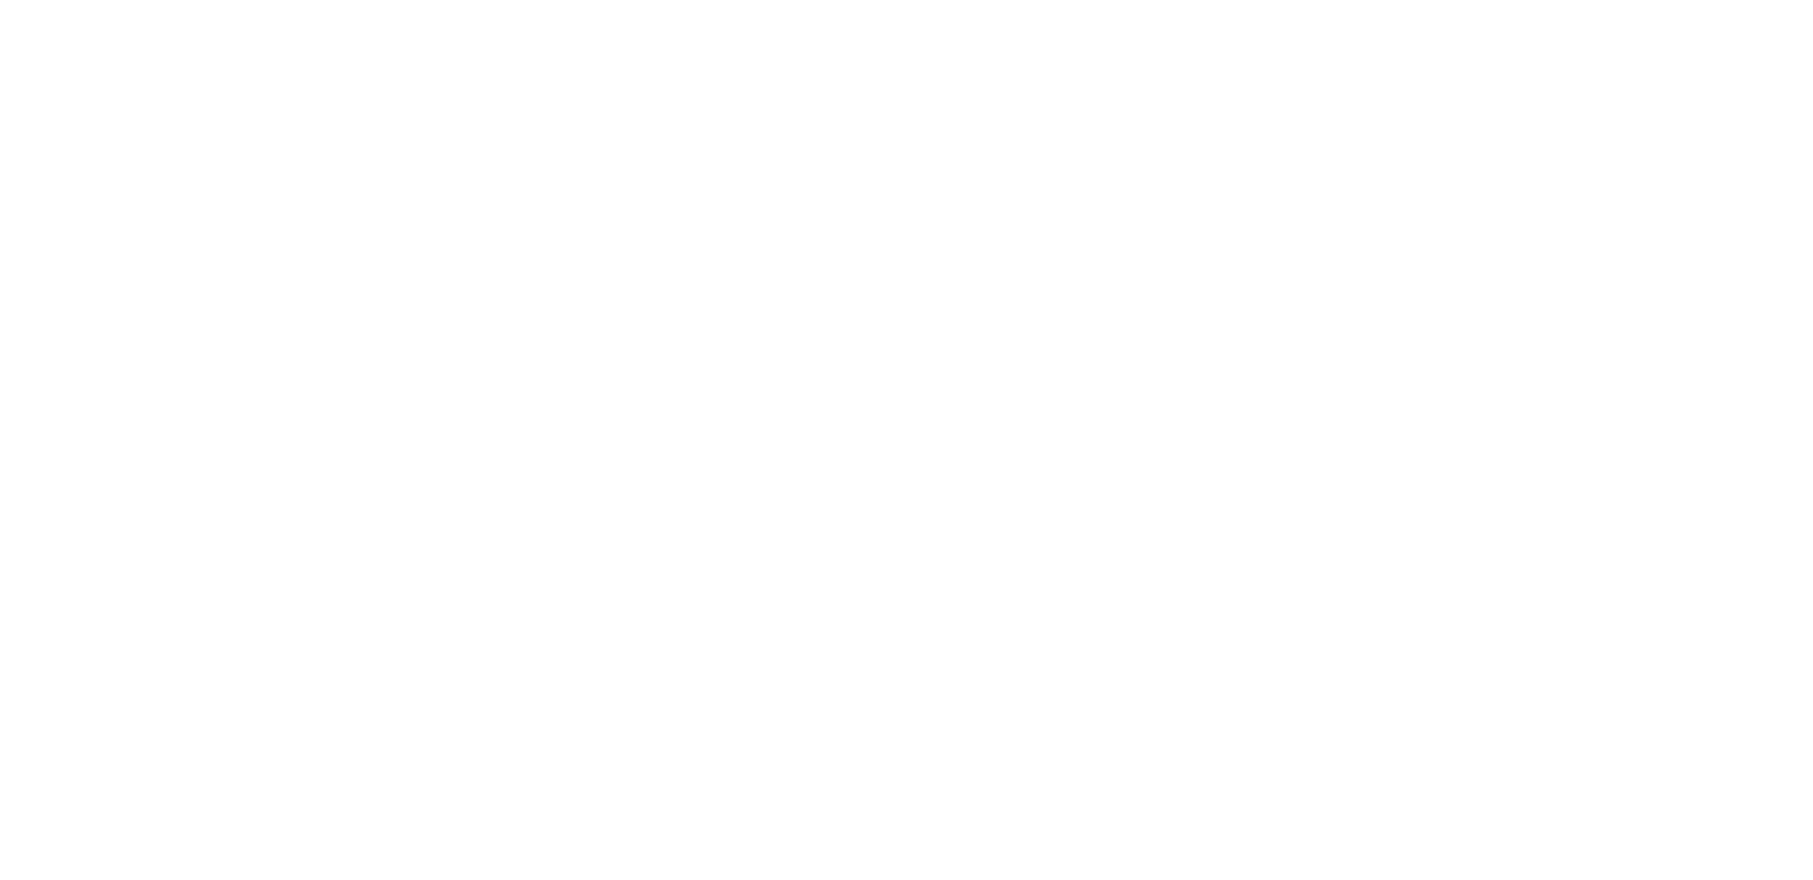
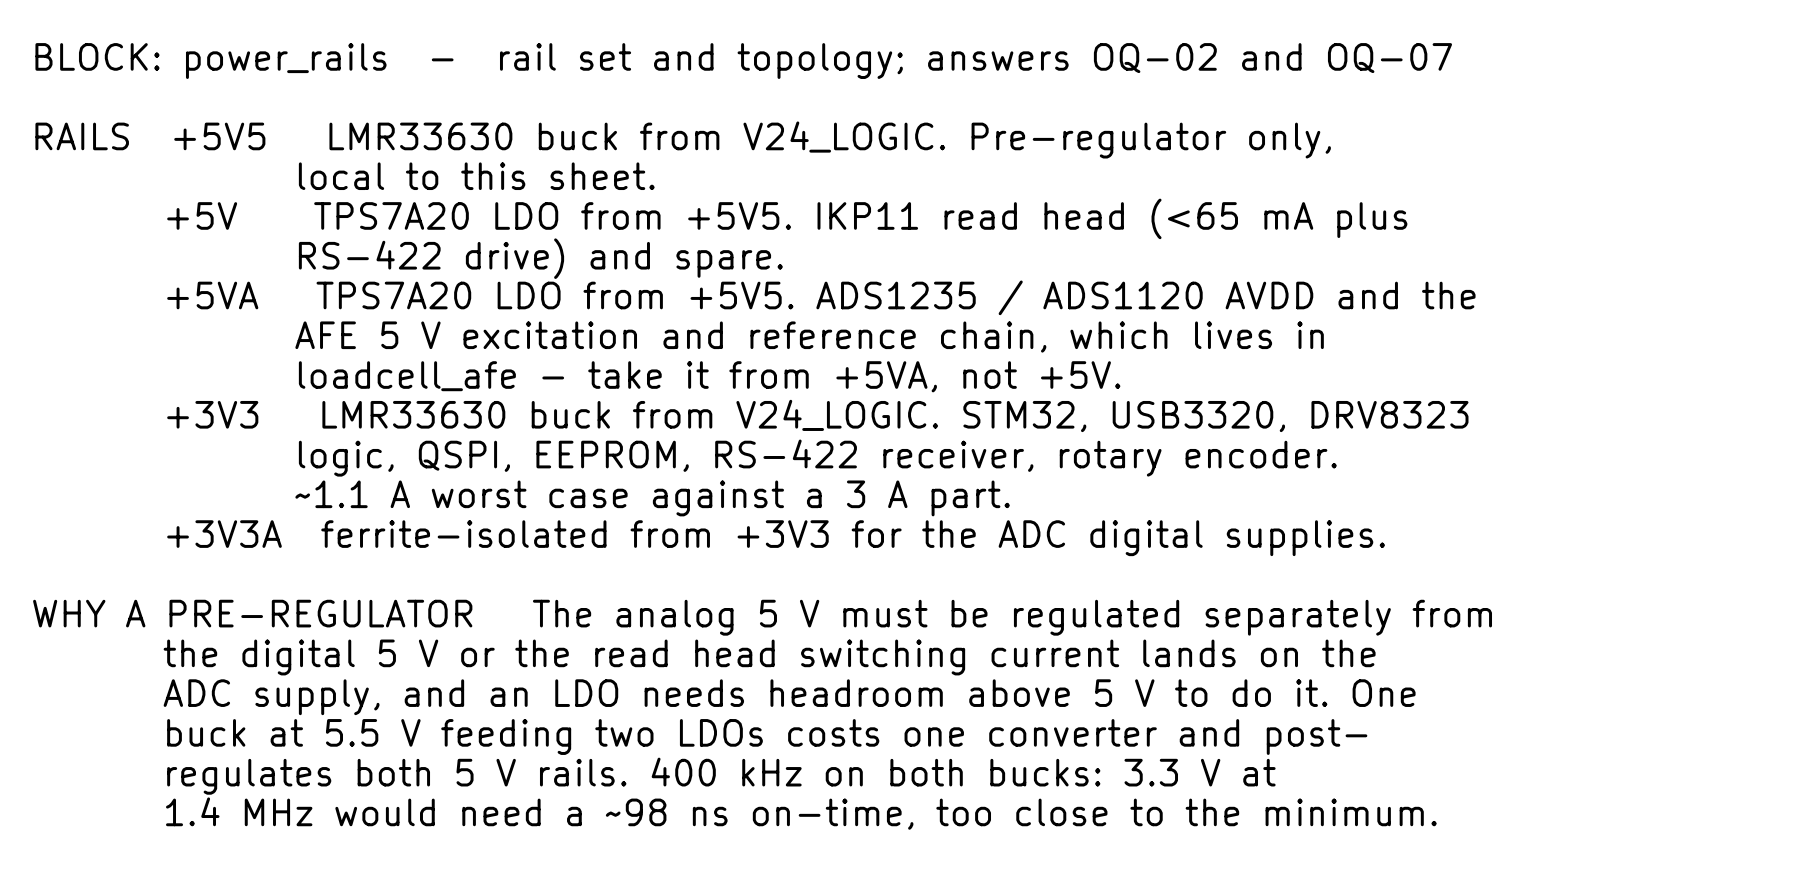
text: none -> BLOCK: power_rails - rail set and topology; answers OQ-02 and OQ-07 (743, 61)
text: none -> RAILS +5V5 LMR33630 buck from V24_LOGIC. Pre-regulator only, (683, 139)
text: none -> local to this sheet. (476, 176)
text: none -> +5V TPS7A20 LDO from +5V5. IKP11 read head (<65 mA plus (787, 218)
text: none -> RS-422 drive) and spare. (540, 258)
text: none -> +5VA TPS7A20 LDO from +5V5. ADS1235 / ADS1120 AVDD and the (821, 297)
text: none -> AFE 5 V excitation and reference chain, which lives in (809, 337)
text: none -> loadcell_afe - take it from +5VA, not +5V. (709, 376)
text: none -> +3V3 LMR33630 buck from V24_LOGIC. STM32, USB3320, DRV8323 (817, 415)
text: none -> logic, QSPI, EEPROM, RS-422 receiver, rotary encoder. (817, 458)
text: none -> ~1.1 A worst case against a 3 A part. (652, 498)
text: none -> +3V3A ferrite-isolated from +3V3 for the ADC digital supplies. (776, 538)
text: none -> WHY A PRE-REGULATOR The analog 5 V must be regulated separately from (762, 617)
text: none -> the digital 5 V or the read head switching current lands on the (769, 657)
text: none -> ADC supply, and an LDO needs headroom above 5 V to do it. One (789, 697)
text: none -> buck at 5.5 V feeding two LDOs costs one converter and post- (767, 737)
text: none -> regulates both 5 V rails. 400 kHz on both bucks: 3.3 V at (721, 776)
text: none -> 1.4 MHz would need a ~98 ns on-time, too close to the minimum. (801, 813)

